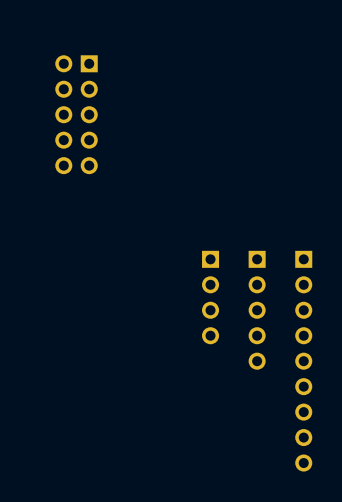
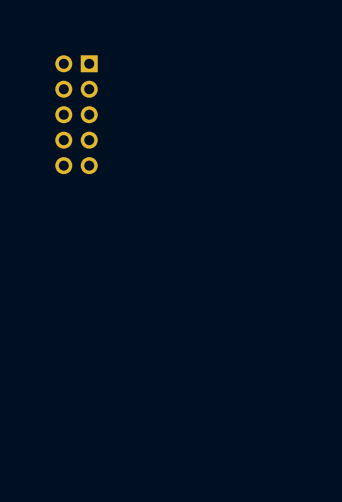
part: (210, 297) -> none
part: (257, 310) -> none
part: (303, 361) -> none

